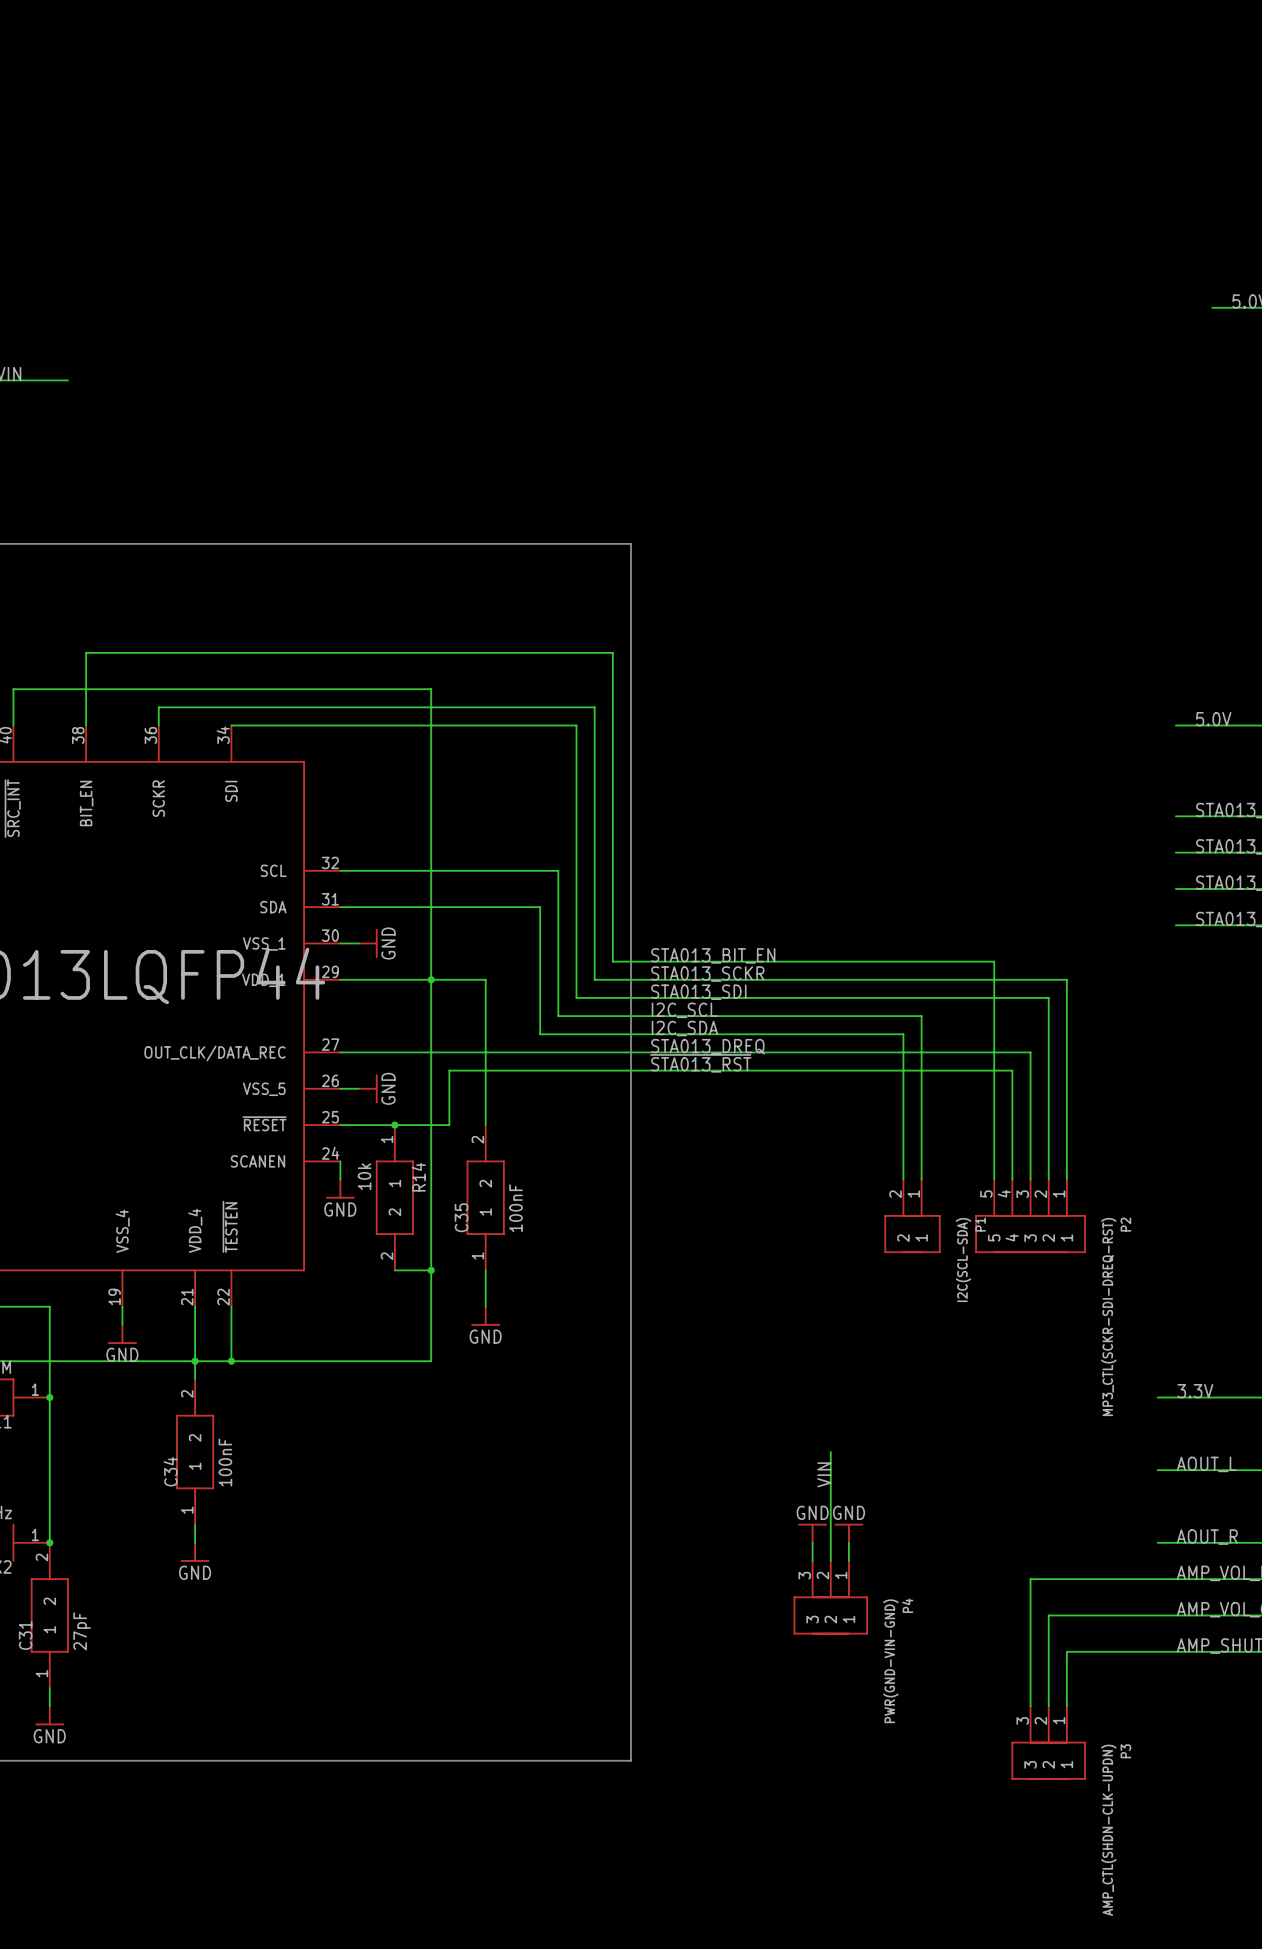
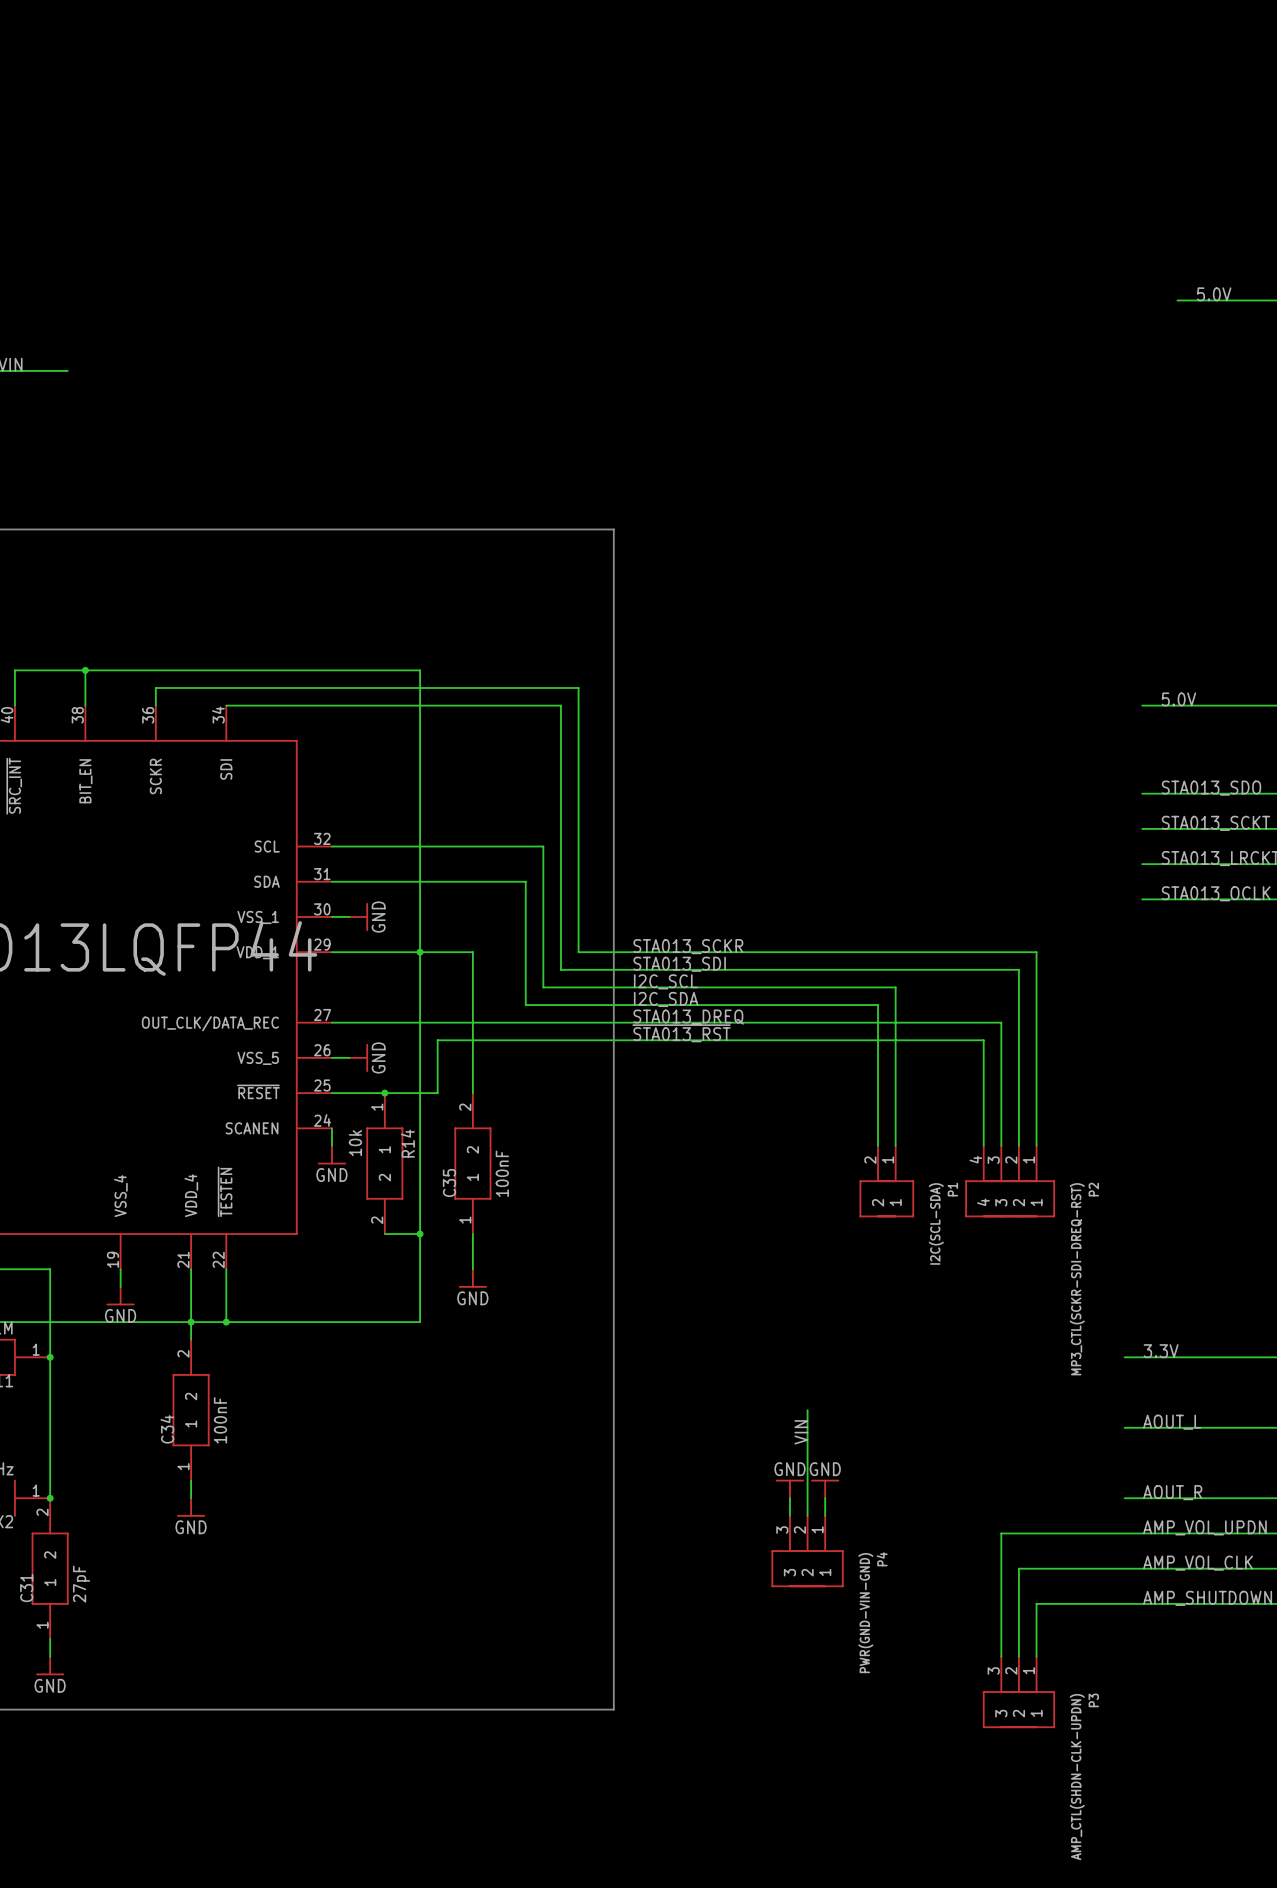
wire: (86, 689) (86, 652) (612, 652) (612, 961) (994, 961) (994, 1179) -> none
junction: none -> (85, 670)
label: STA013_BIT_EN (713, 955) -> none
P2 symbol: [975, 1179, 1086, 1254] -> [965, 1145, 1056, 1218]

